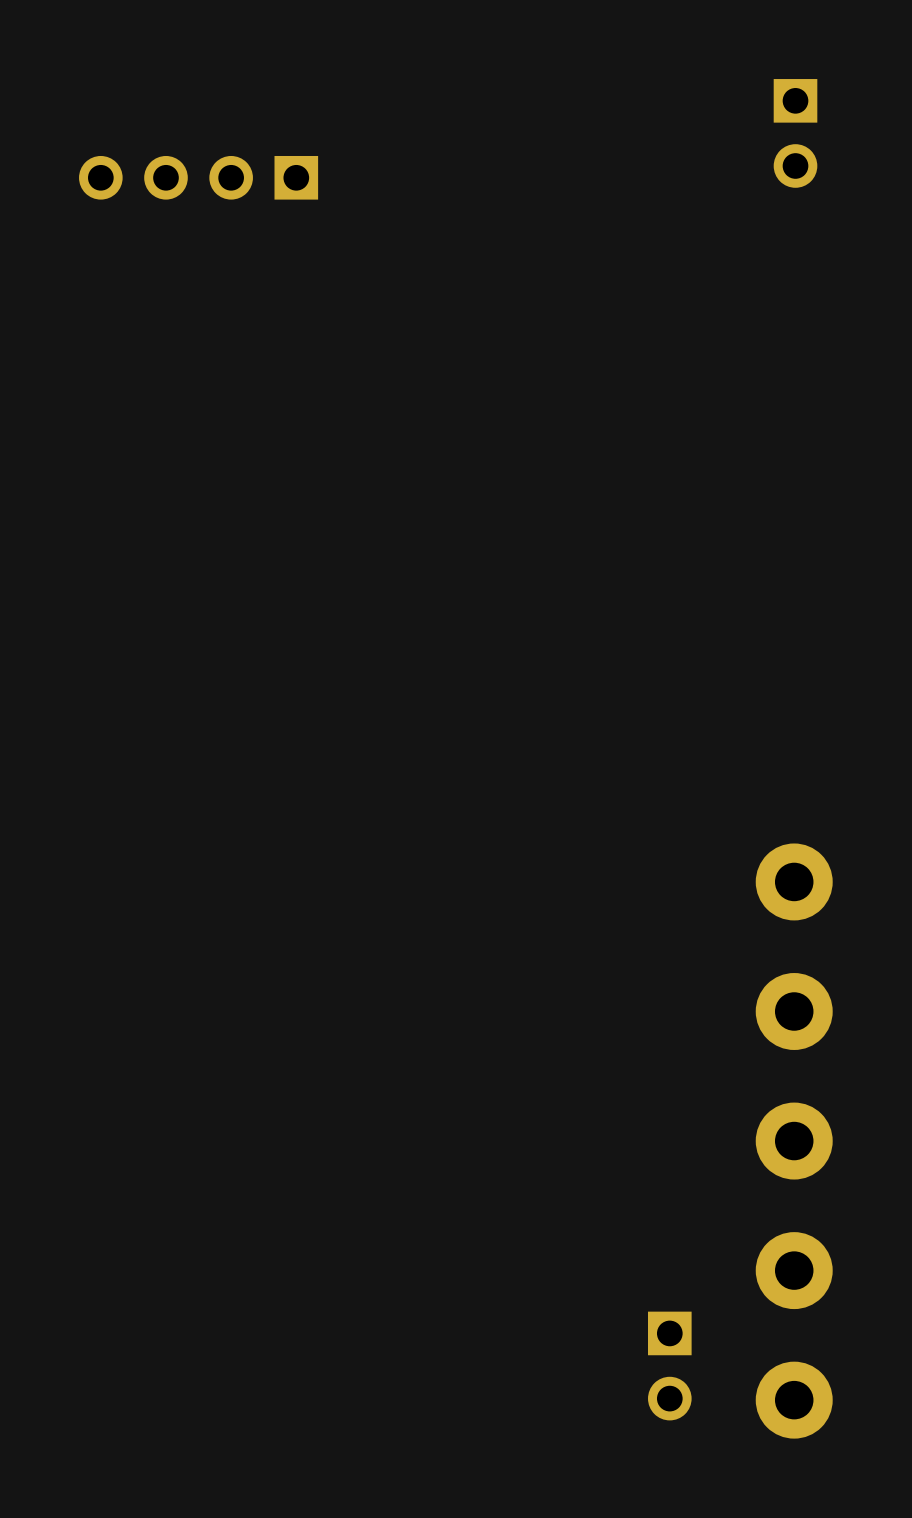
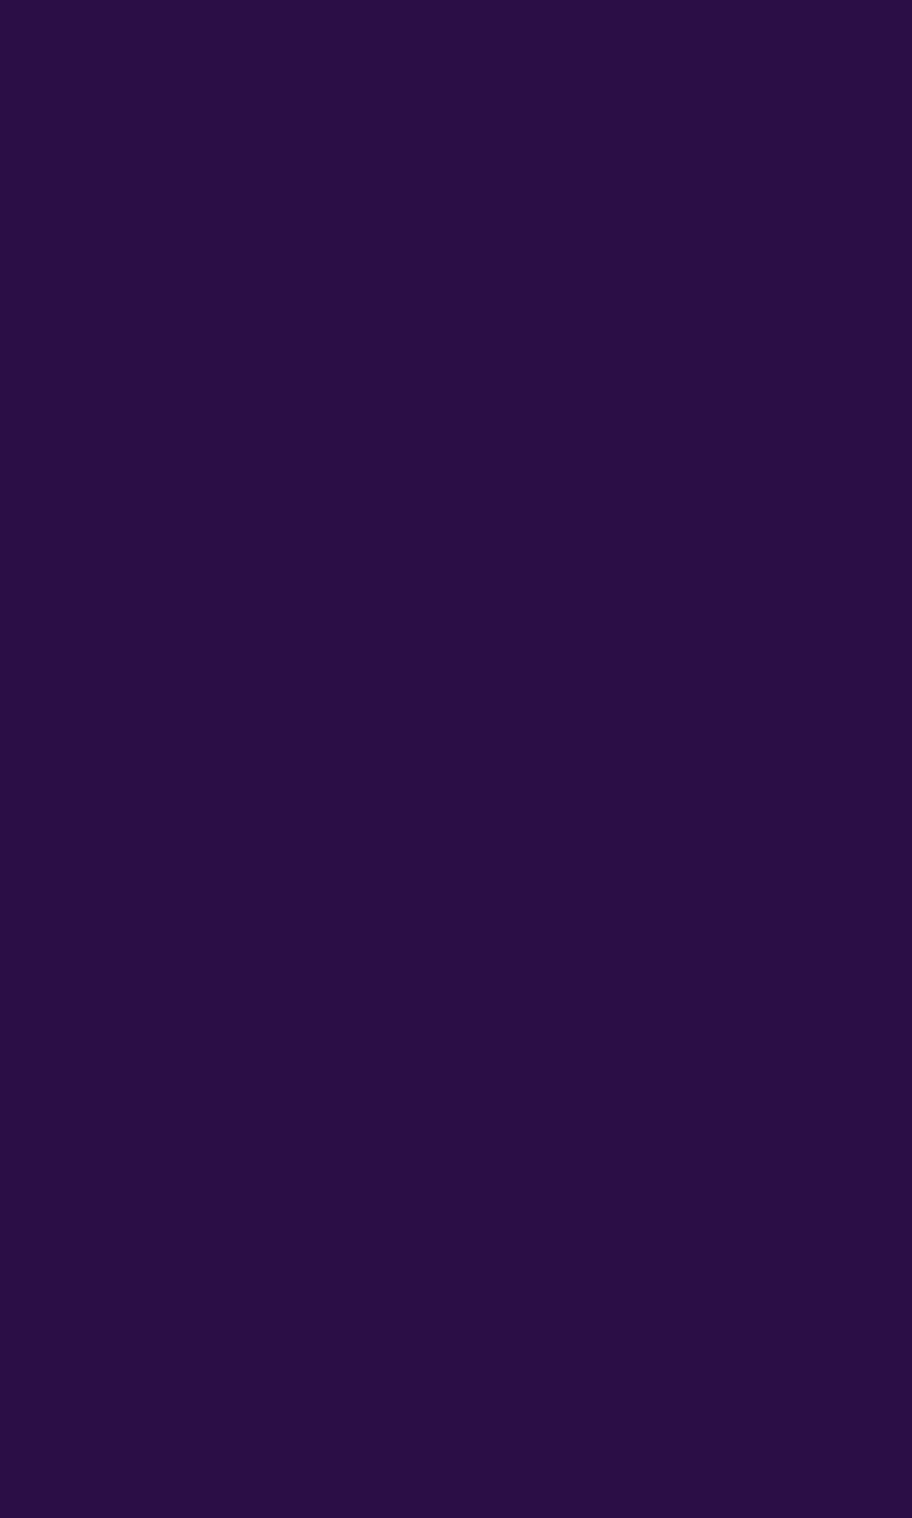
part: (795, 133) -> none
part: (198, 177) -> none
part: (794, 881) -> none
part: (794, 1011) -> none
part: (794, 1141) -> none
part: (794, 1270) -> none
part: (669, 1366) -> none
part: (794, 1400) -> none

